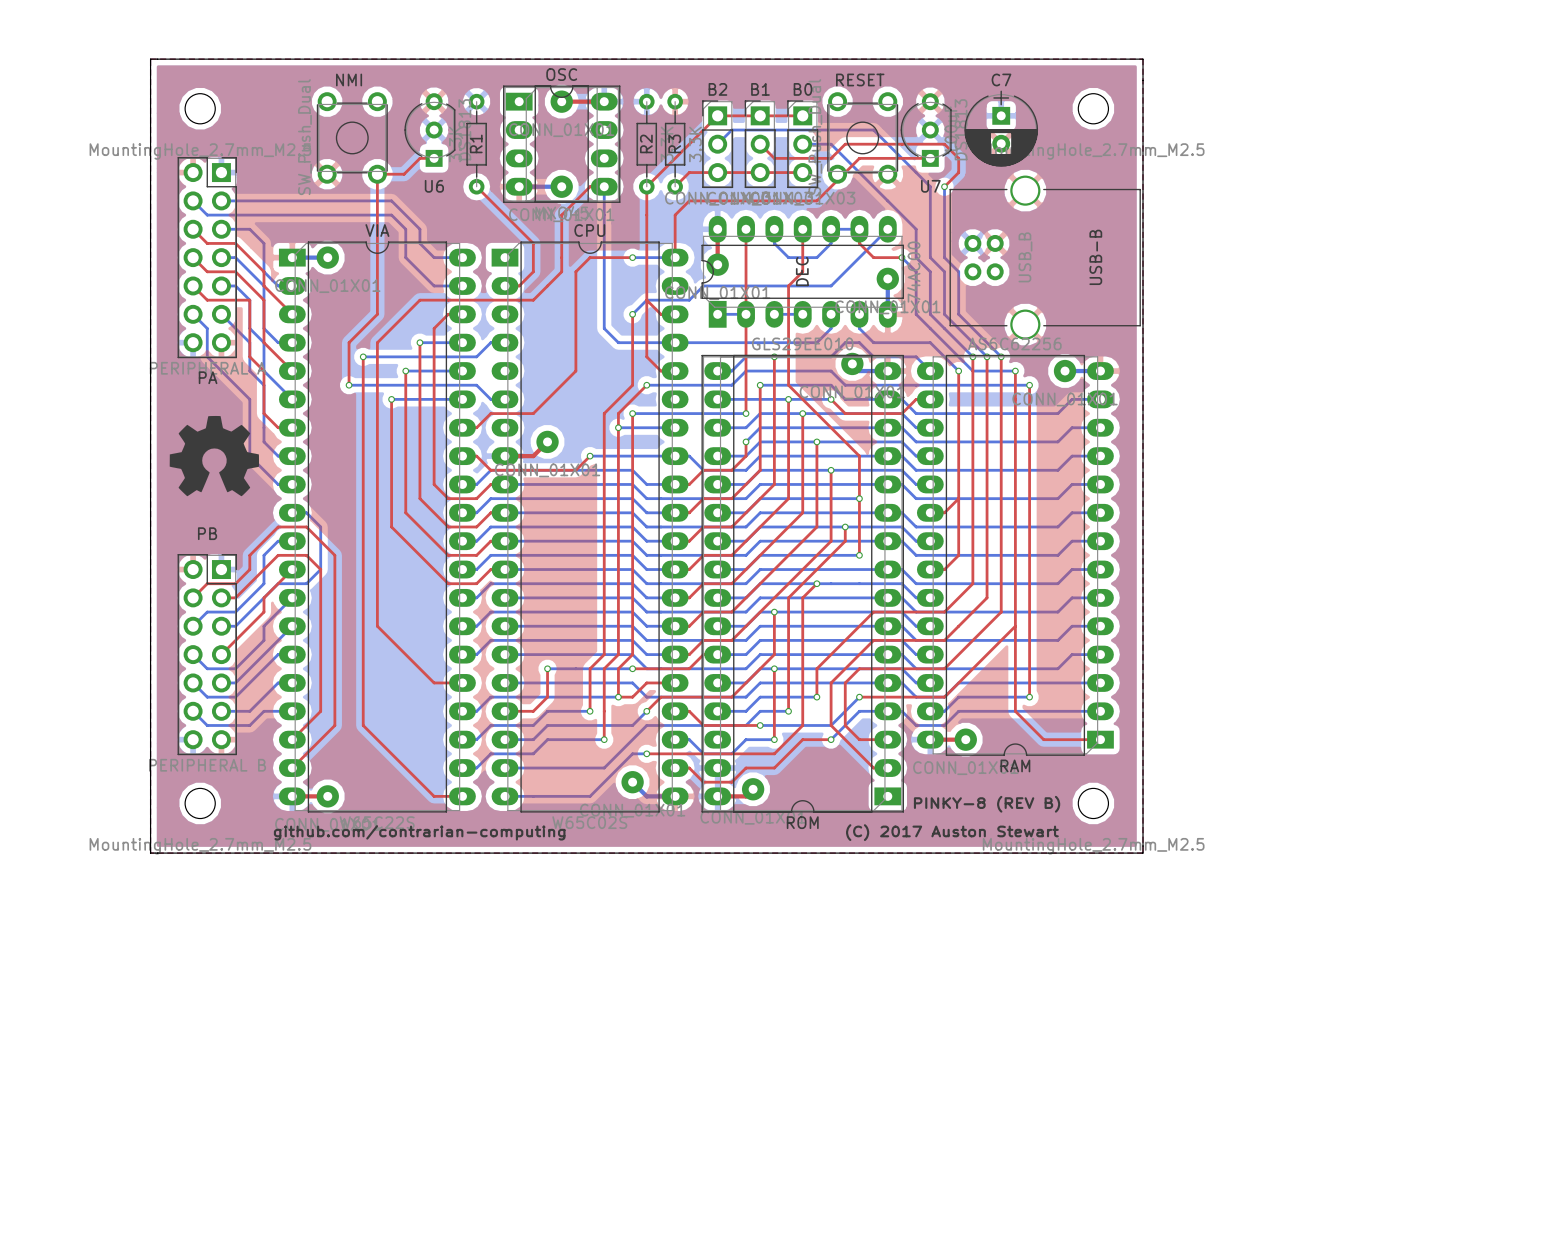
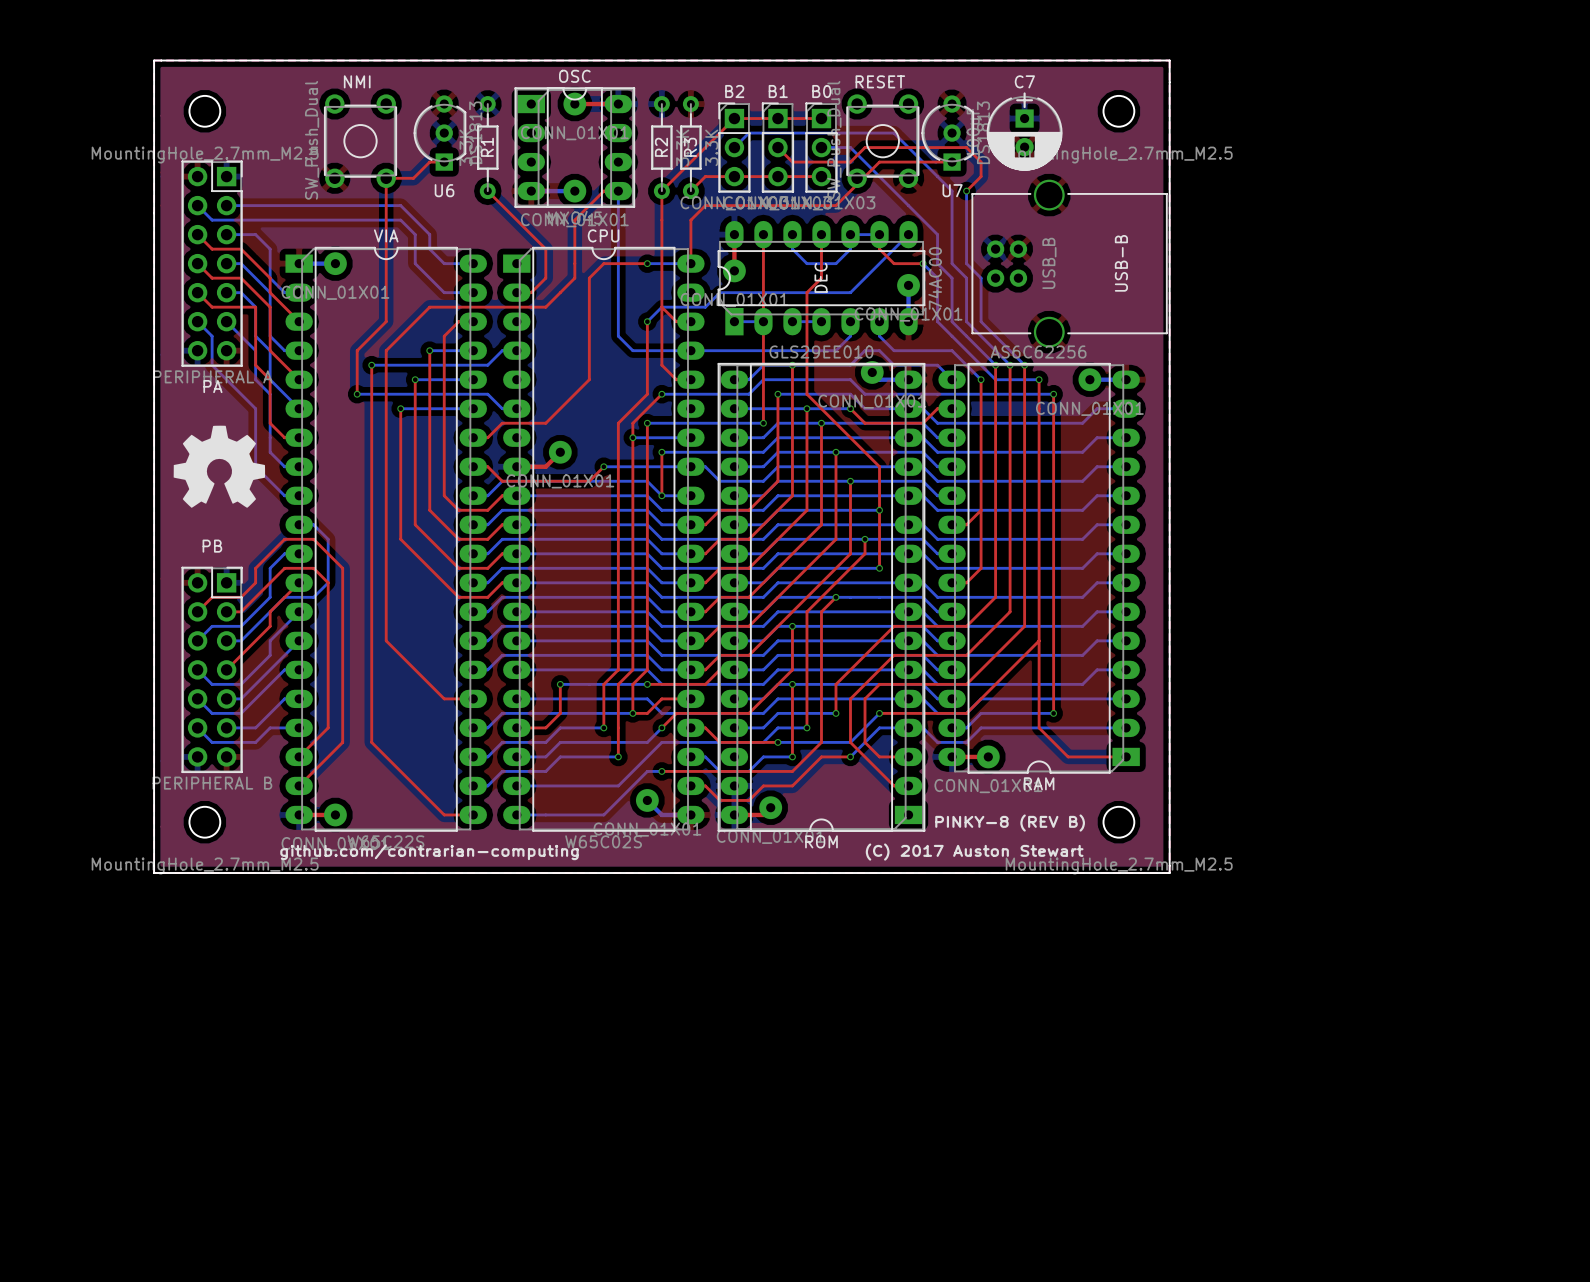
top track: none -> (661, 452) (661, 495)
bottom track: none -> (661, 452) (763, 452)
via: none -> (661, 452)
top track: (746, 441) (746, 456) (731, 470) (703, 470) (689, 484) (675, 484) -> none
via: (746, 441) -> none
via: none -> (661, 495)

